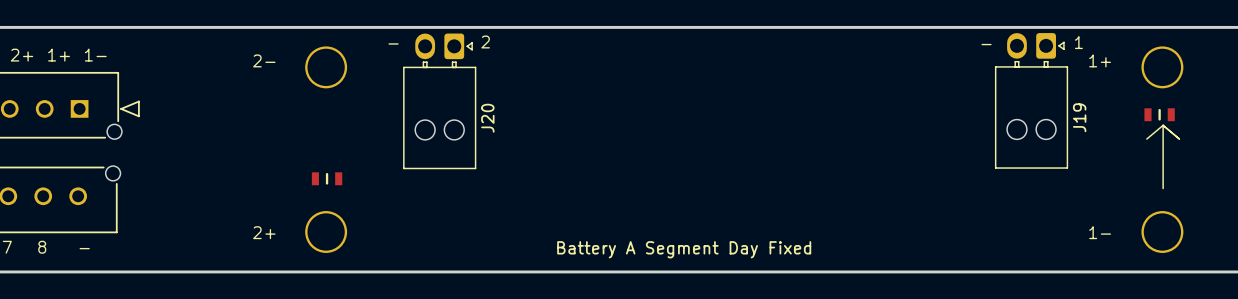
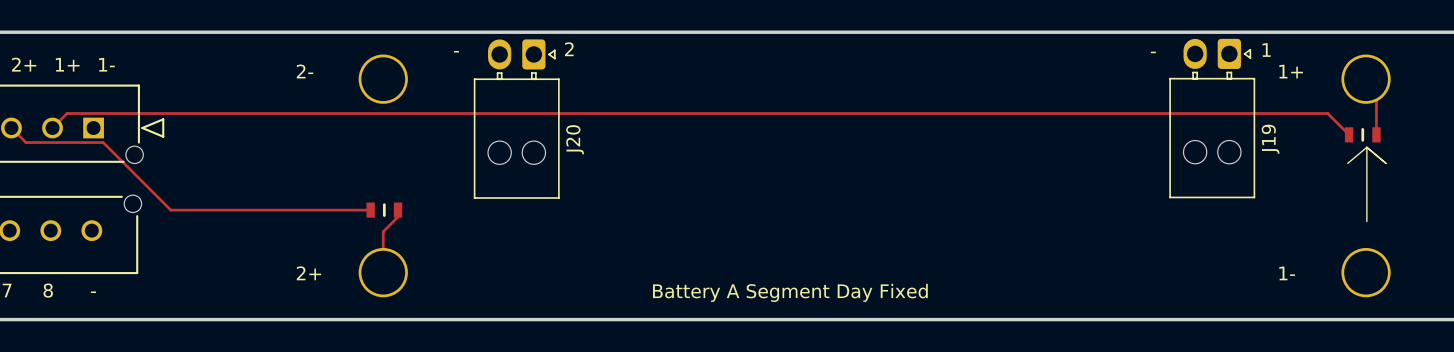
track: none -> (1366, 79) (1376, 89) (1376, 134)
track: none -> (11, 128) (25, 142) (103, 142) (170, 210) (370, 210)
track: none -> (52, 128) (67, 113) (1327, 113) (1349, 134)
track: none -> (398, 210) (398, 216) (383, 231) (383, 272)

